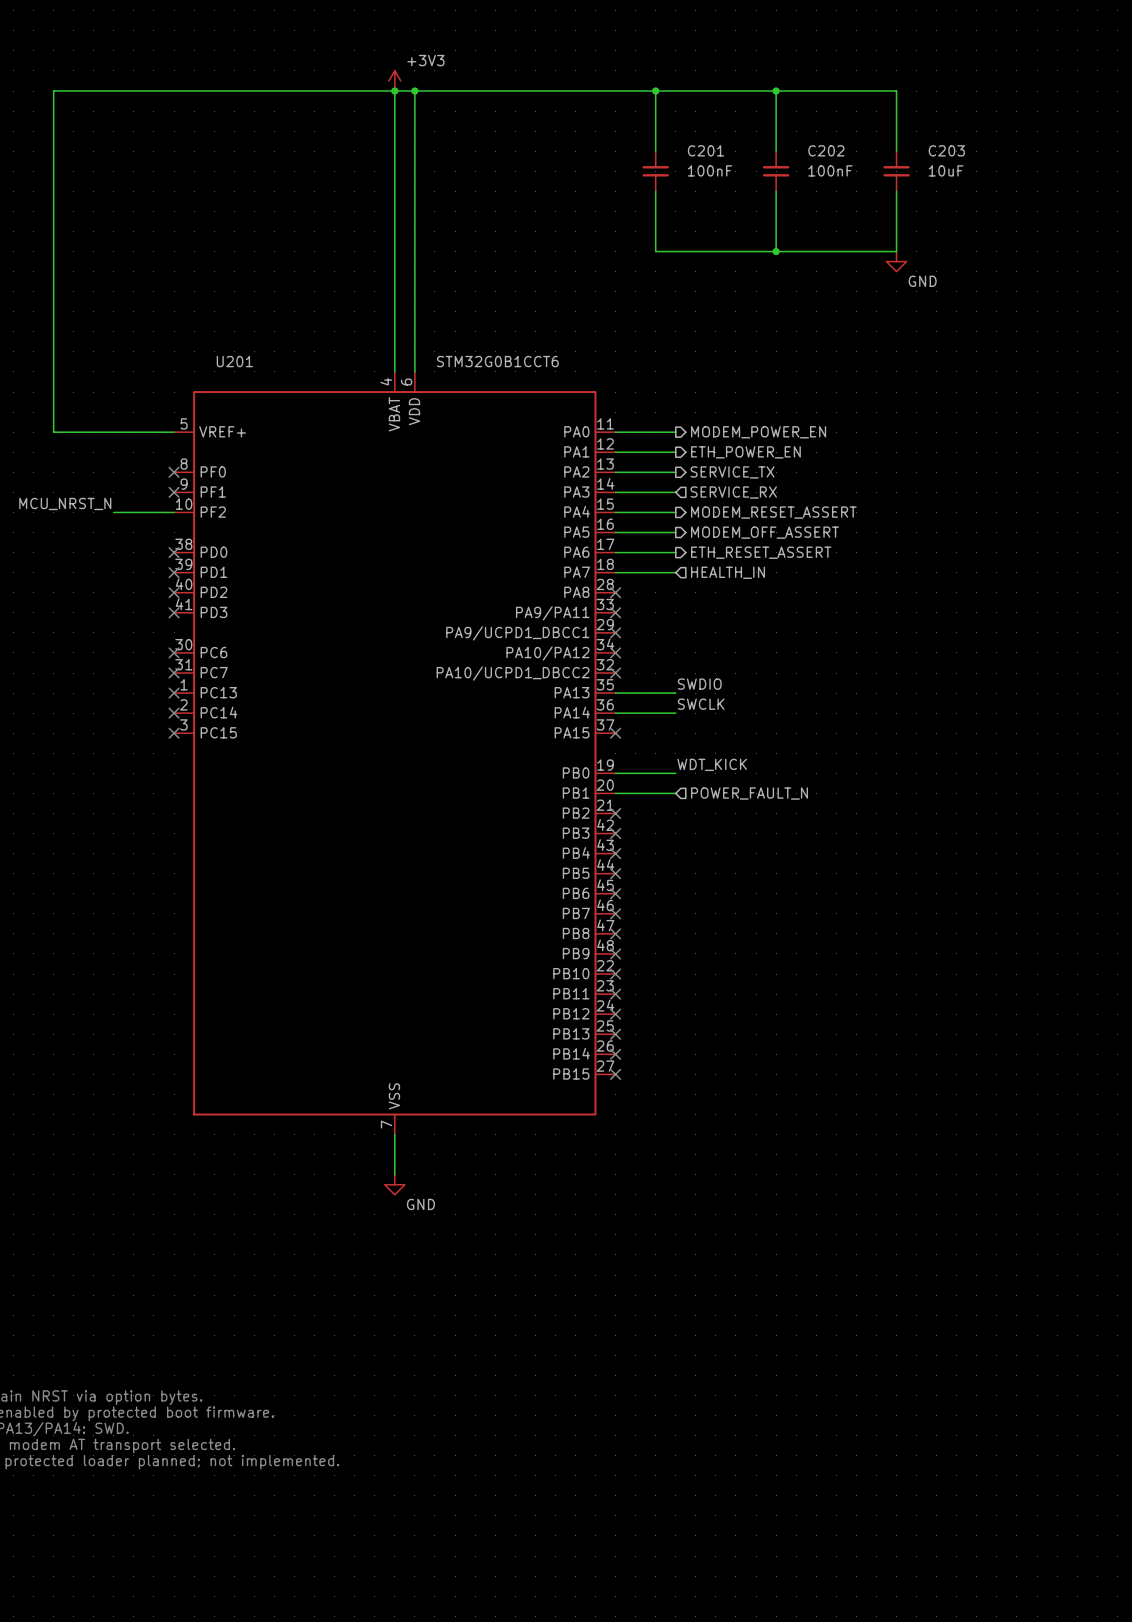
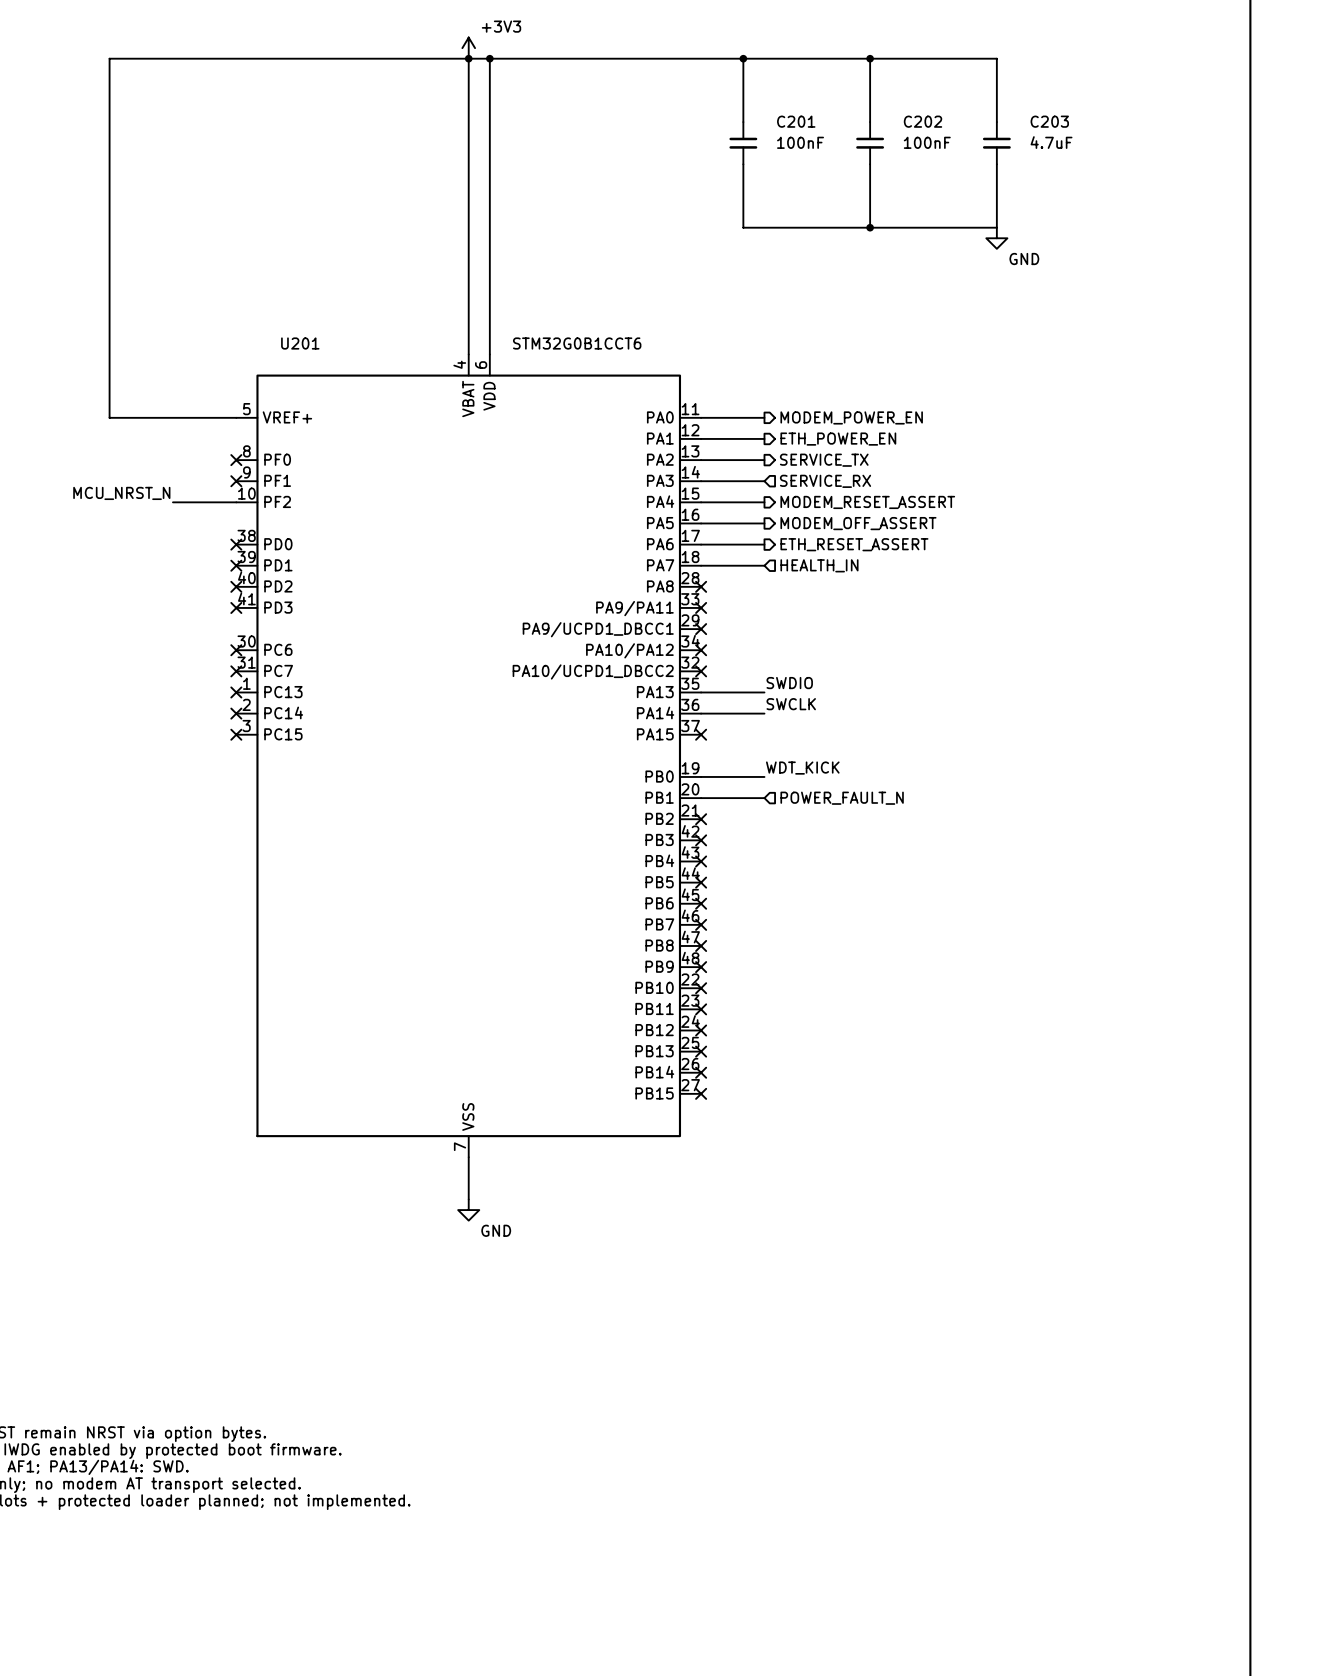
C203 value: 10uF (946, 170) -> 4.7uF (1051, 142)

